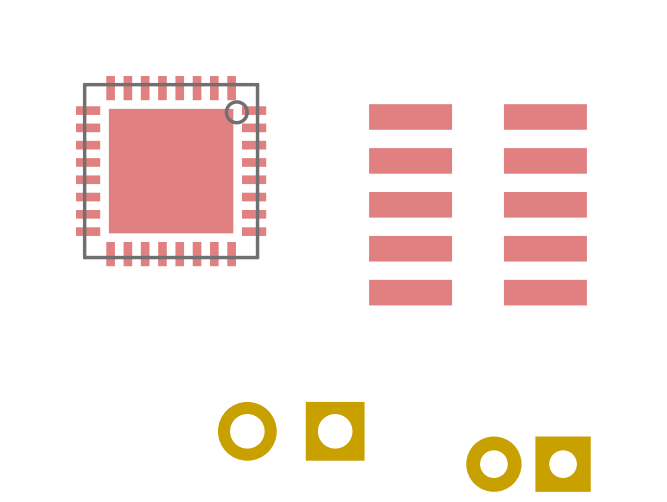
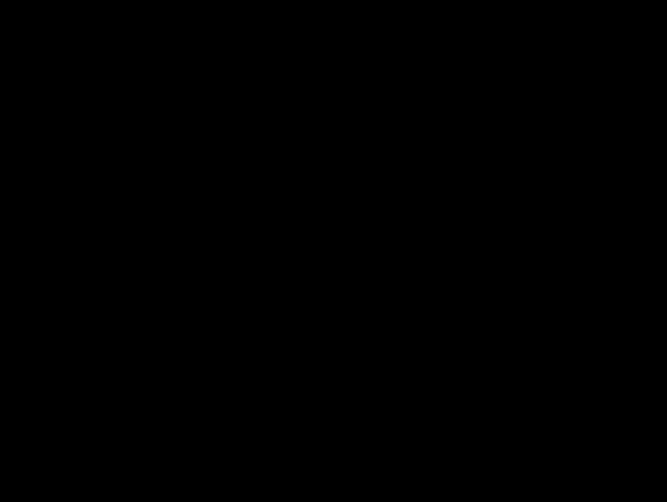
part: (171, 171) -> none
part: (477, 204) -> none
part: (291, 431) -> none
part: (528, 464) -> none

